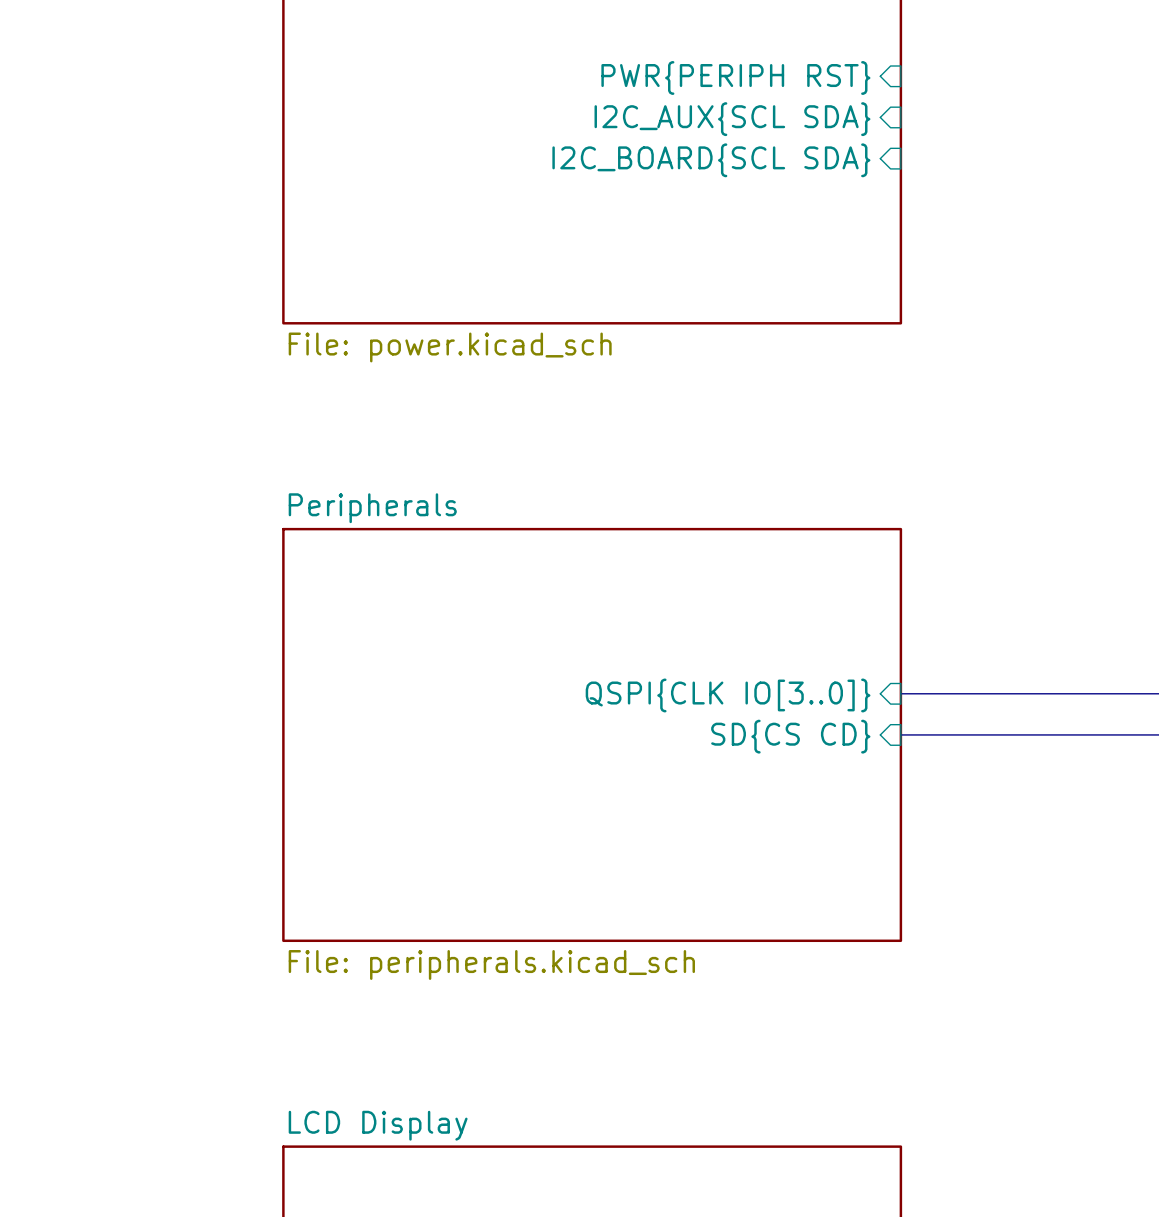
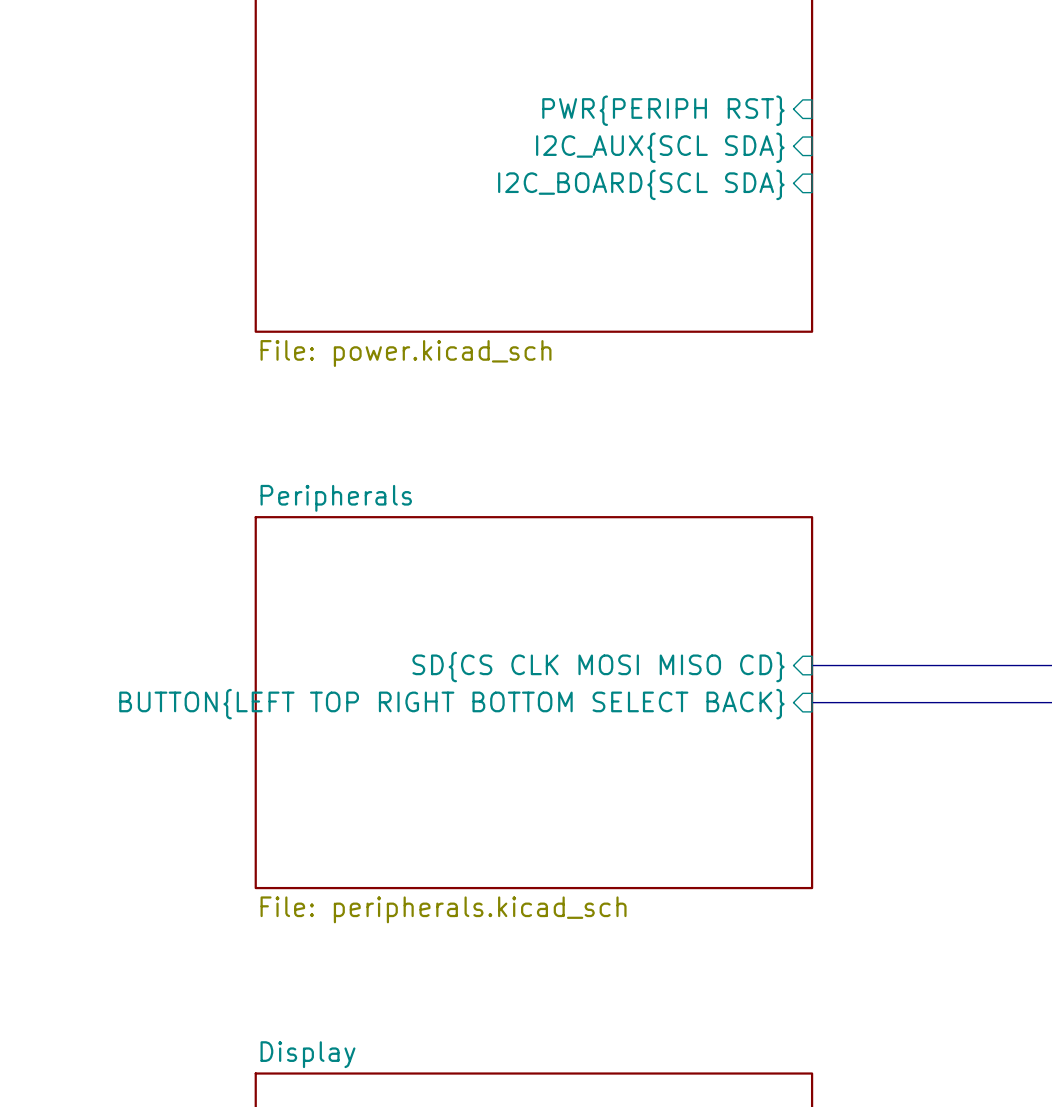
sheet pin: QSPI{CLK IO[3..0]} (728, 695) -> SD{CS CLK MOSI MISO CD} (598, 667)
sheet pin: SD{CS CD} (790, 736) -> BUTTON{LEFT TOP RIGHT BOTTOM SELECT BACK} (451, 704)
sheet LCD Display name: LCD Display (378, 1125) -> Display (307, 1054)

